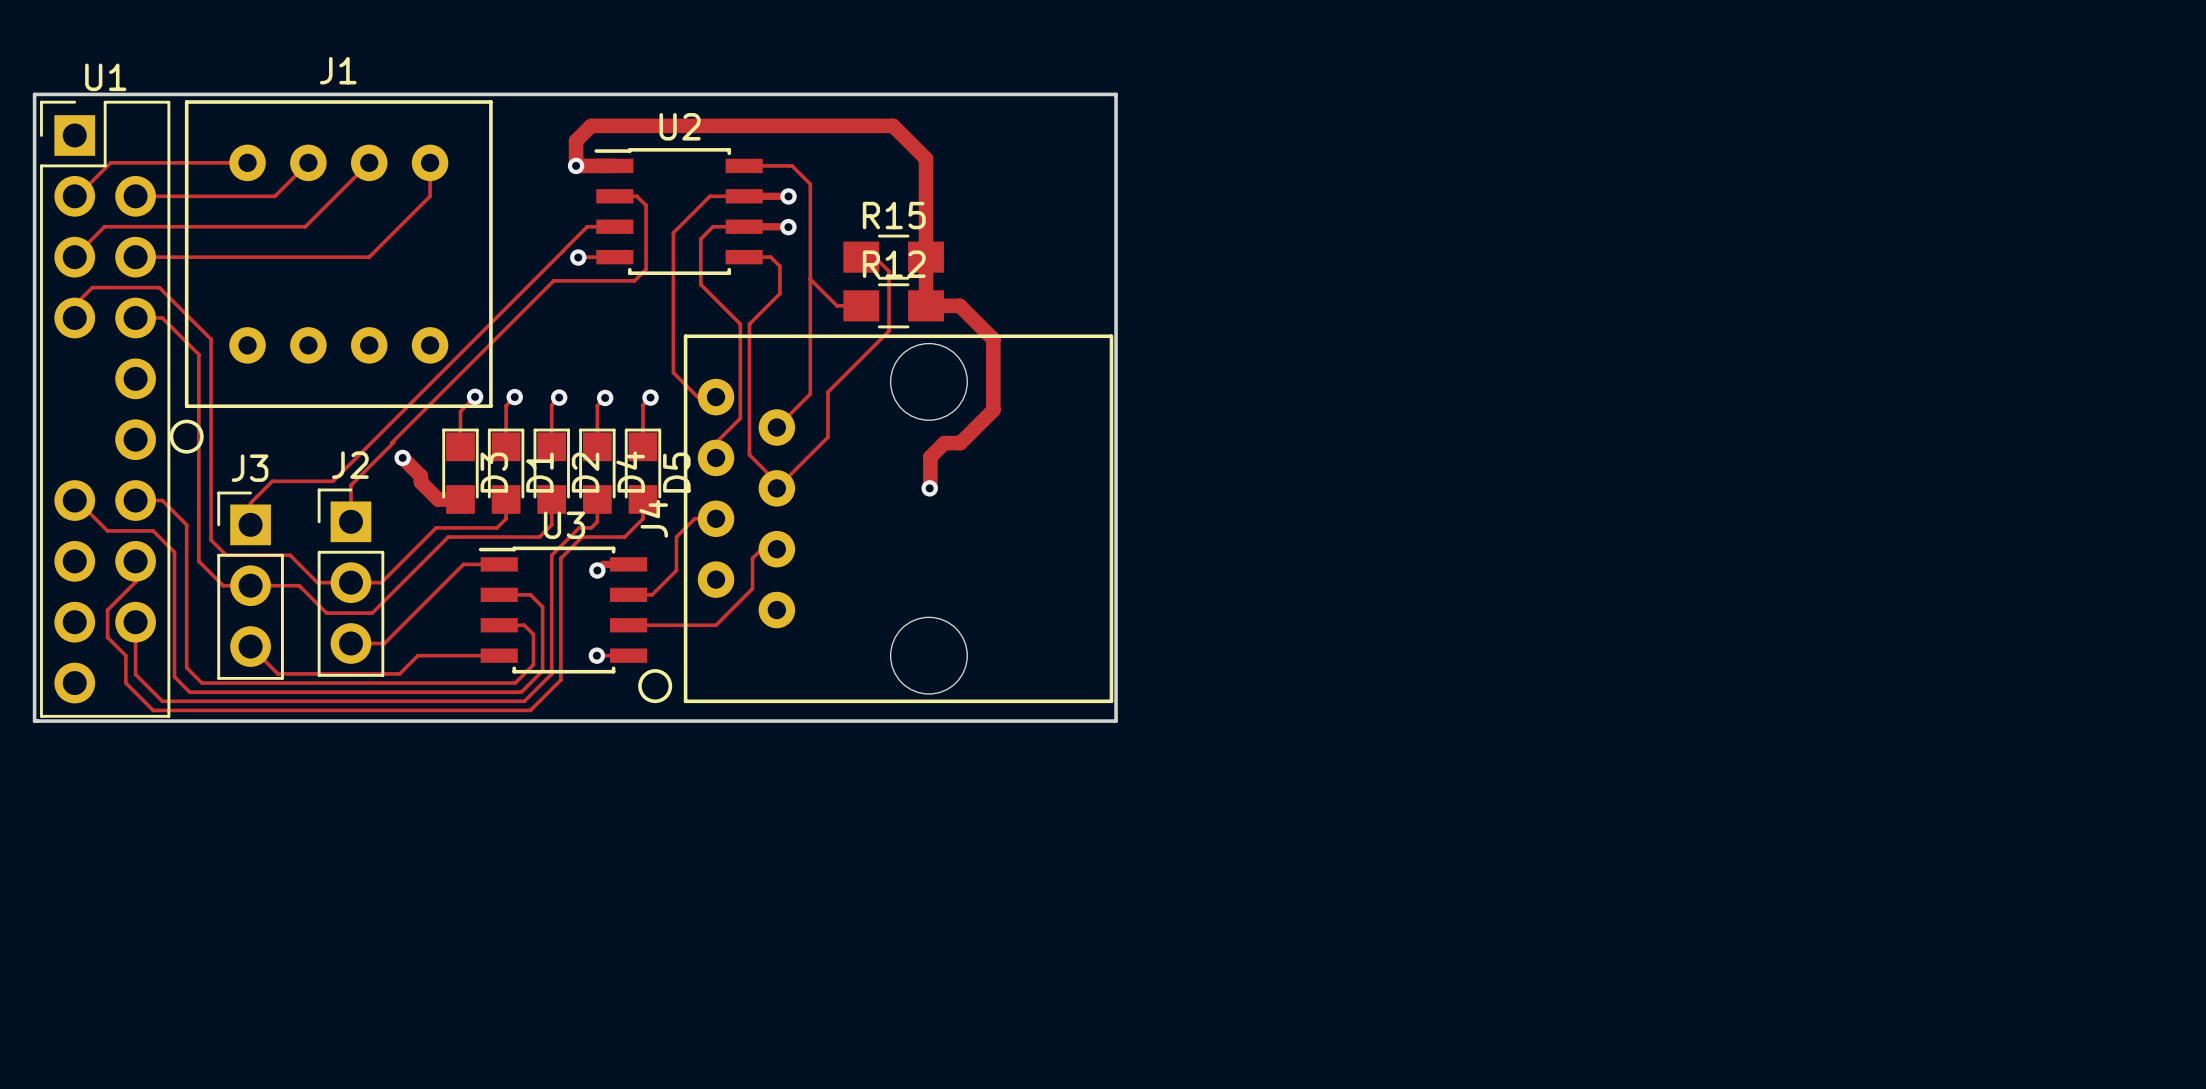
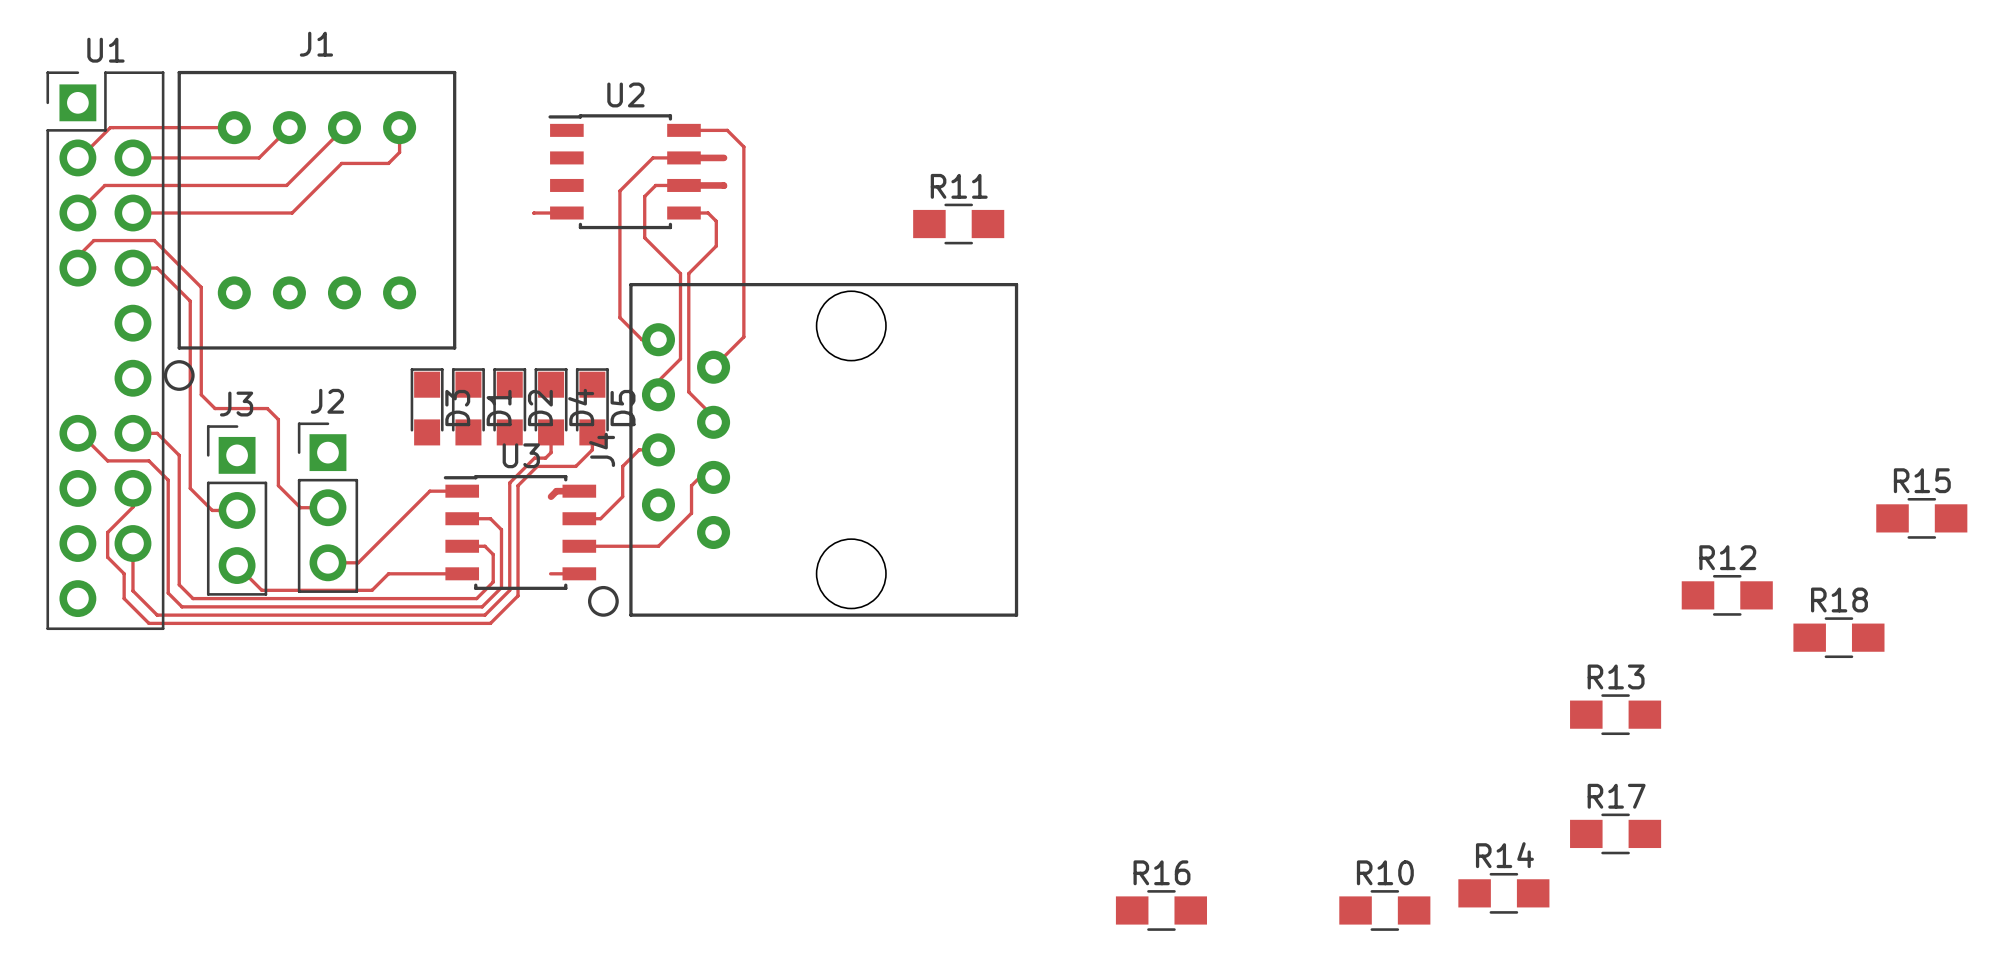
board edge: (34, 94) (34, 721) (1116, 721) (1116, 94) (34, 94) -> none
via: (576, 165) -> none
track: (614, 165) (576, 165) (576, 140) (591, 125) (893, 125) (926, 158) (926, 305) (959, 305) (993, 339) (993, 410) (960, 443) (944, 443) (930, 457) (929, 488) -> none
track: (430, 190) (430, 196) (369, 257) (311, 257) -> (399, 152) (388, 163) (341, 163) (292, 213)
track: (614, 196) (636, 196) (646, 205) (646, 269) (634, 280) (553, 280) (350, 485) (350, 521) -> none
via: (788, 196) -> none
track: (614, 226) (587, 226) (563, 250) -> none
via: (788, 227) -> none
track: (563, 251) (332, 481) (272, 481) (250, 503) (250, 524) -> none
via: (578, 257) -> none
track: (847, 257) (874, 257) (889, 271) (889, 331) (827, 392) (827, 437) (776, 488) -> none
R15 position: (893, 257) -> (1921, 518)
R11: none -> (958, 224)
track: (810, 279) (836, 305) (861, 305) -> none
R12 position: (893, 305) -> (1727, 595)
track: (475, 396) (460, 411) (460, 446) -> none
via: (475, 396) -> none
track: (514, 397) (506, 405) (506, 446) -> none
via: (514, 397) -> none
track: (559, 397) (551, 405) (551, 446) -> none
via: (559, 397) -> none
track: (605, 397) (597, 405) (597, 446) -> none
via: (605, 397) -> none
track: (650, 397) (643, 405) (643, 446) -> none
via: (650, 397) -> none
track: (211, 457) (211, 540) (226, 555) (290, 555) (317, 582) (320, 582) -> (201, 394) (215, 408) (267, 408) (278, 419) (278, 485) (300, 507)
track: (402, 457) (420, 476) (420, 482) (438, 499) (460, 499) -> none
via: (402, 457) -> none
via: (929, 488) -> none
track: (506, 499) (506, 518) (496, 527) (436, 527) (381, 582) (350, 582) -> none
track: (551, 499) (551, 524) (539, 537) (448, 537) (372, 613) (326, 613) (299, 585) (250, 585) -> none
via: (597, 570) -> none
via: (596, 655) -> none
R18: none -> (1838, 637)
R13: none -> (1615, 714)
R17: none -> (1615, 833)
R14: none -> (1503, 893)
R16: none -> (1161, 910)
R10: none -> (1384, 910)

